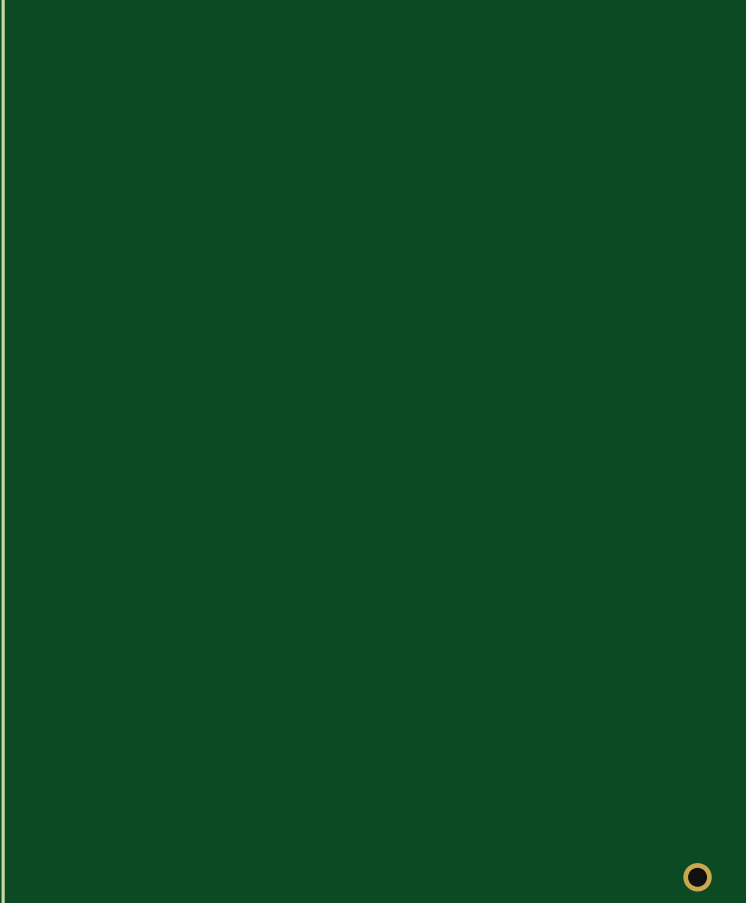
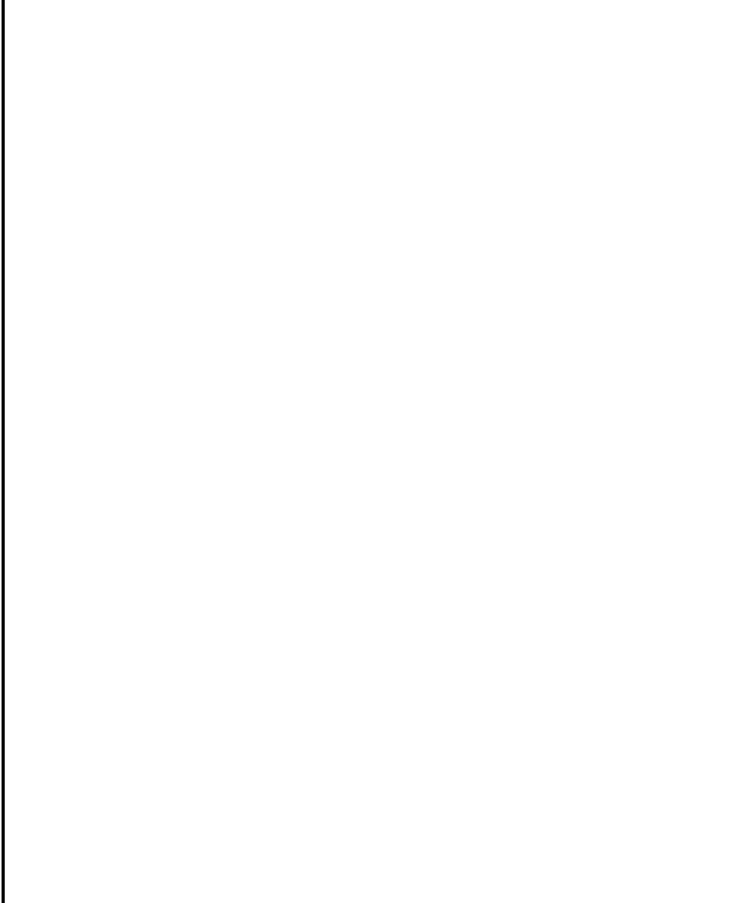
via: (697, 877) -> none

